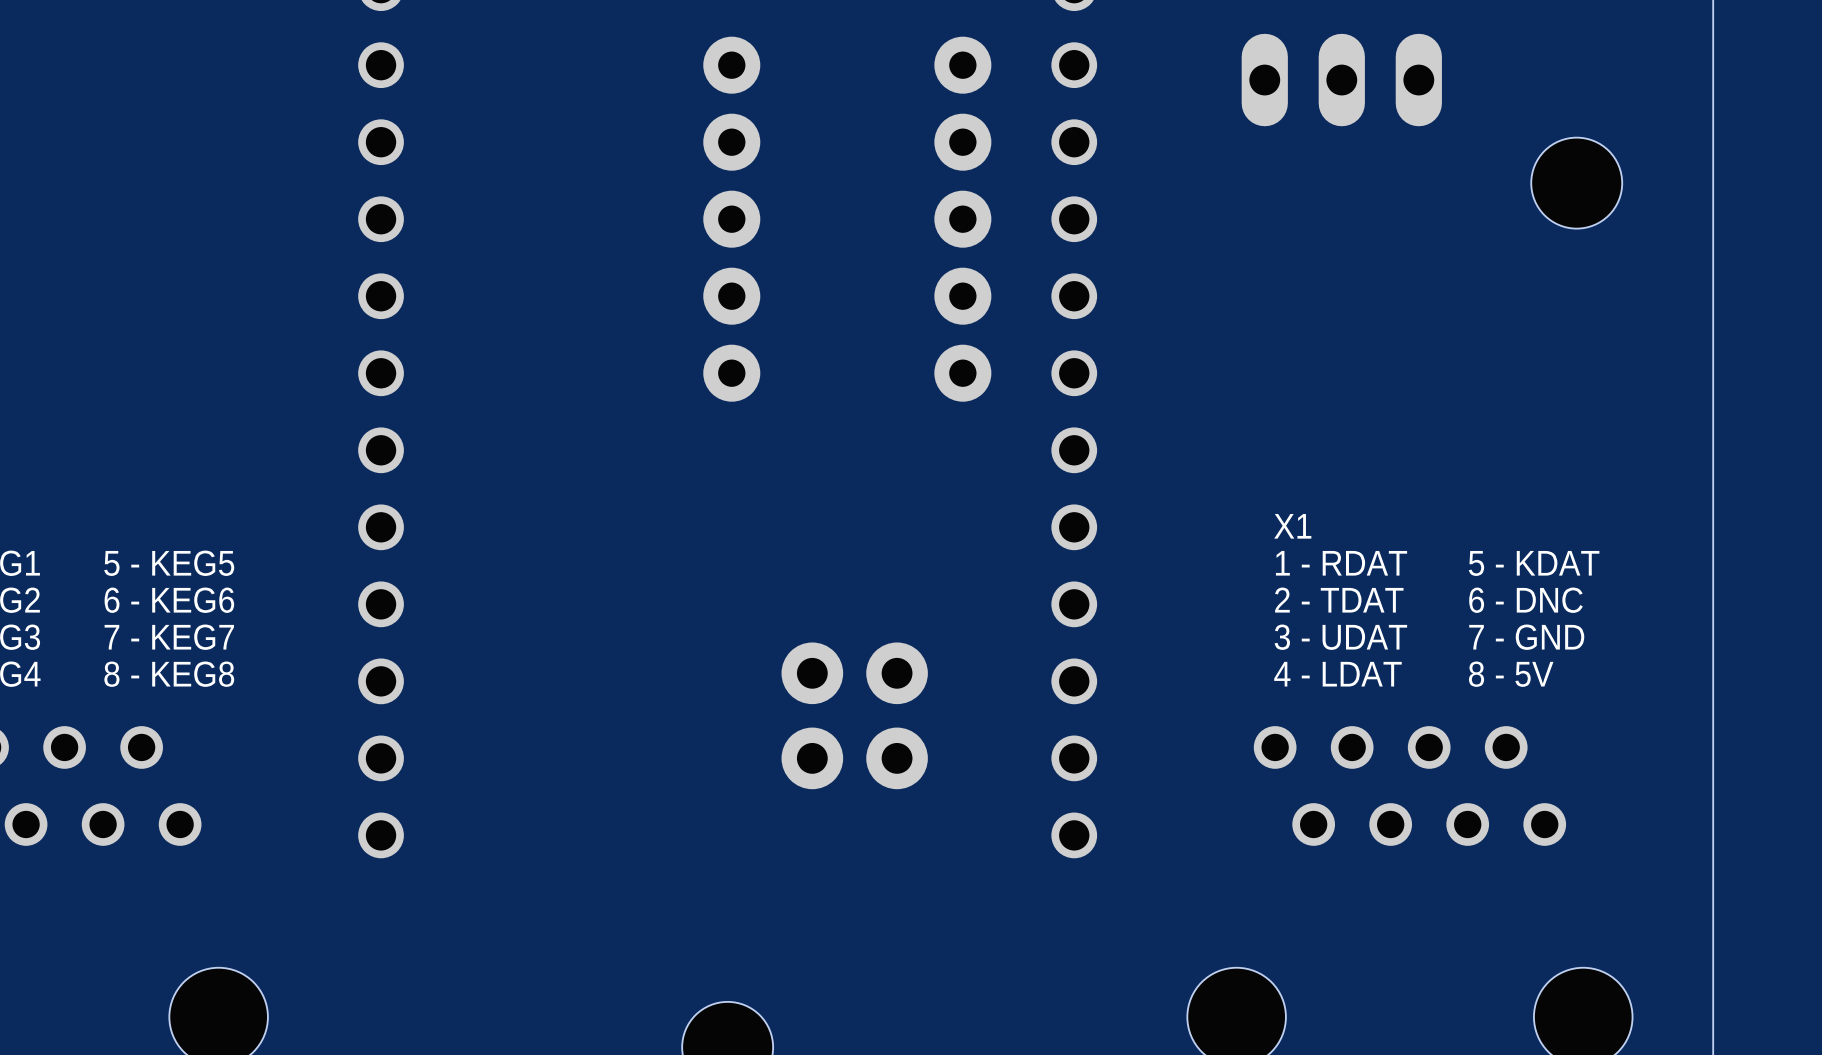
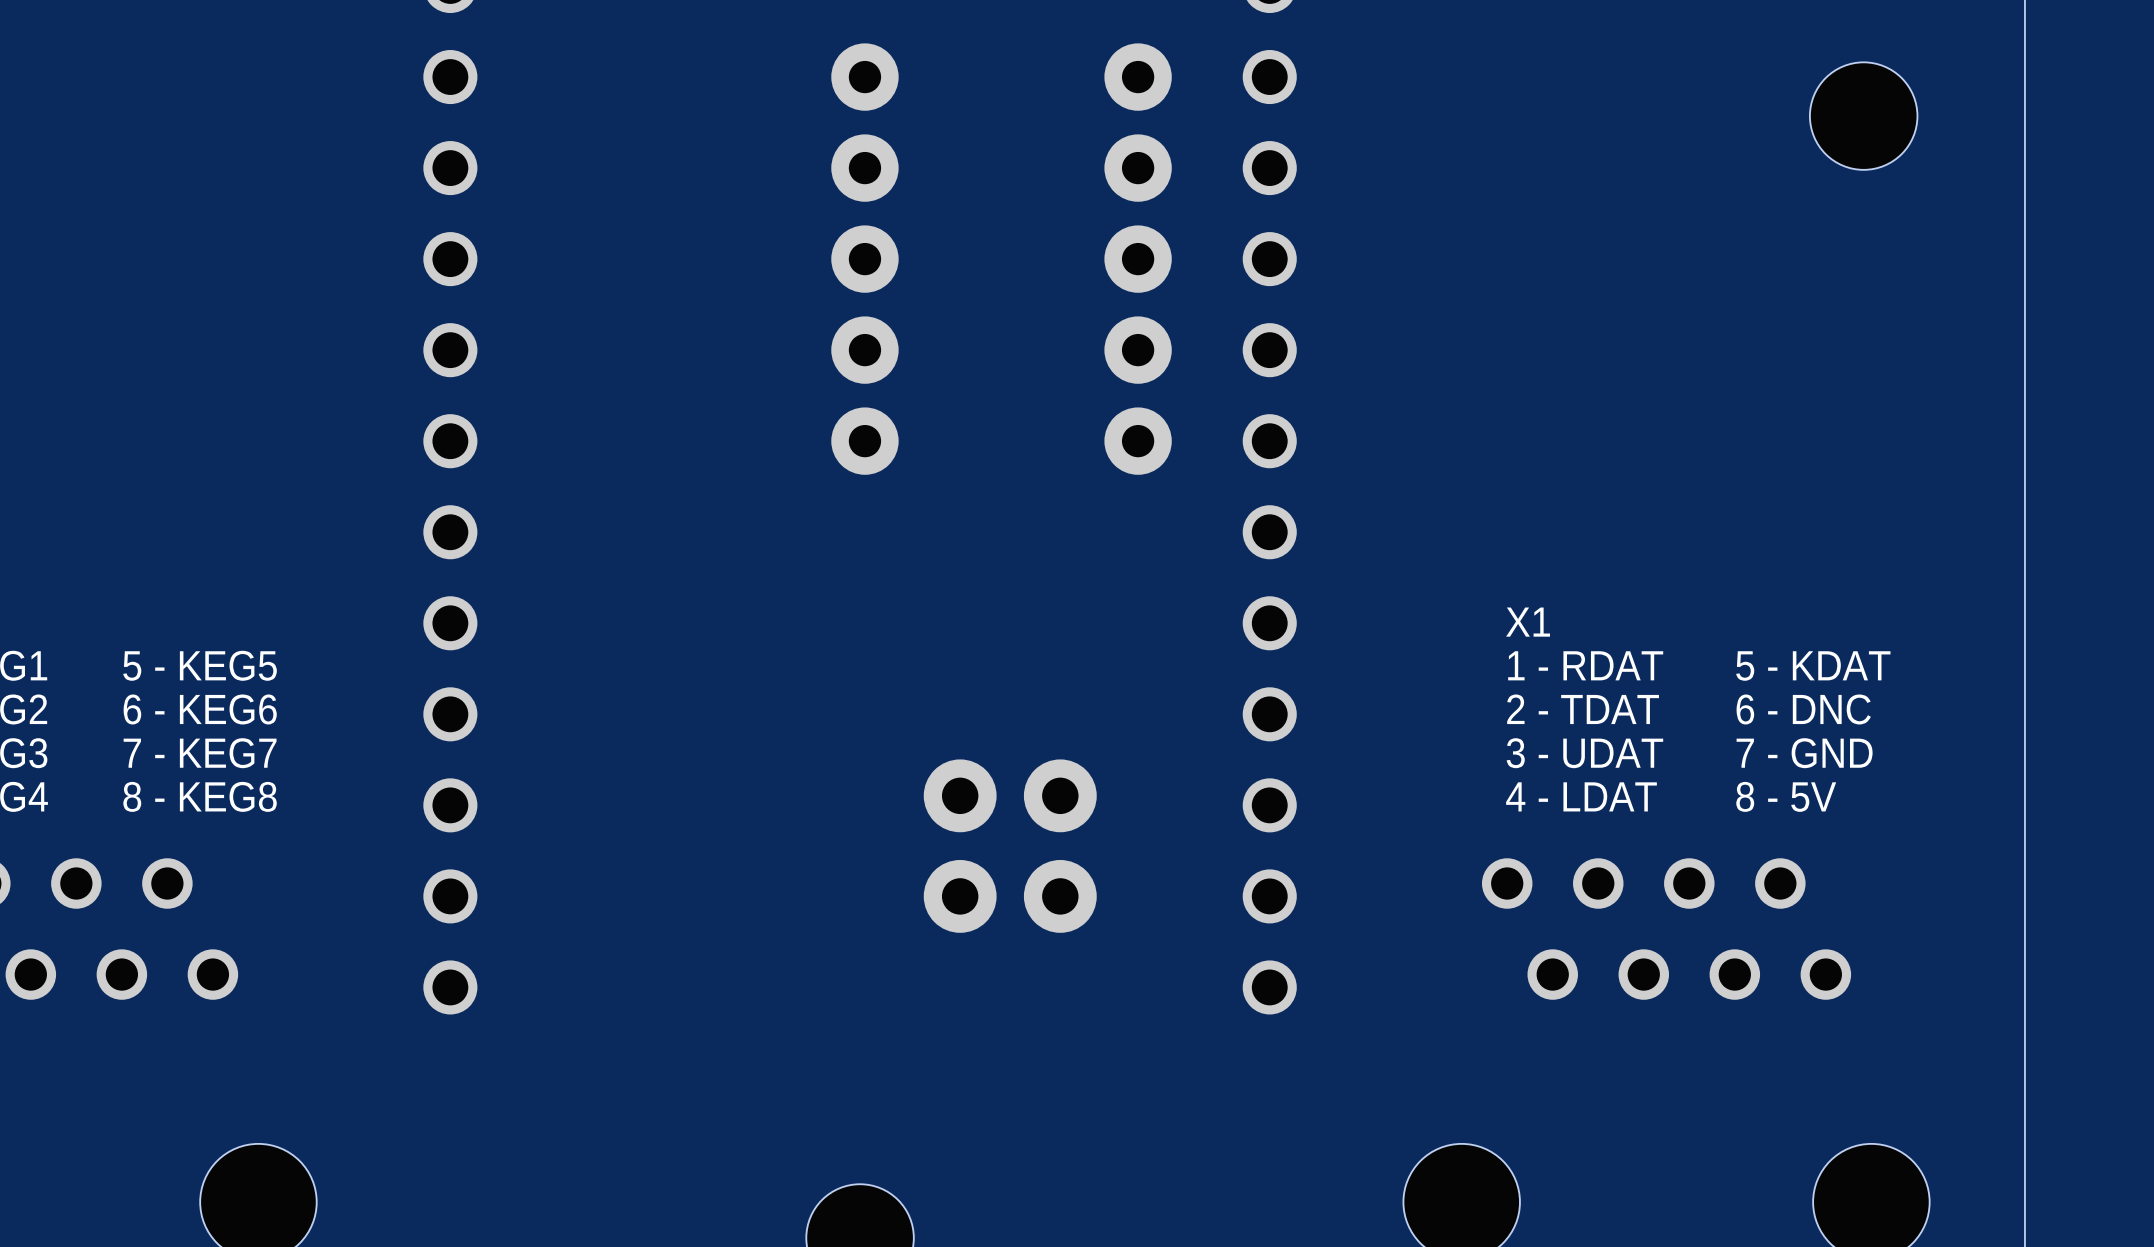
part: (1341, 80) -> none
part position: (1576, 183) -> (1863, 116)

